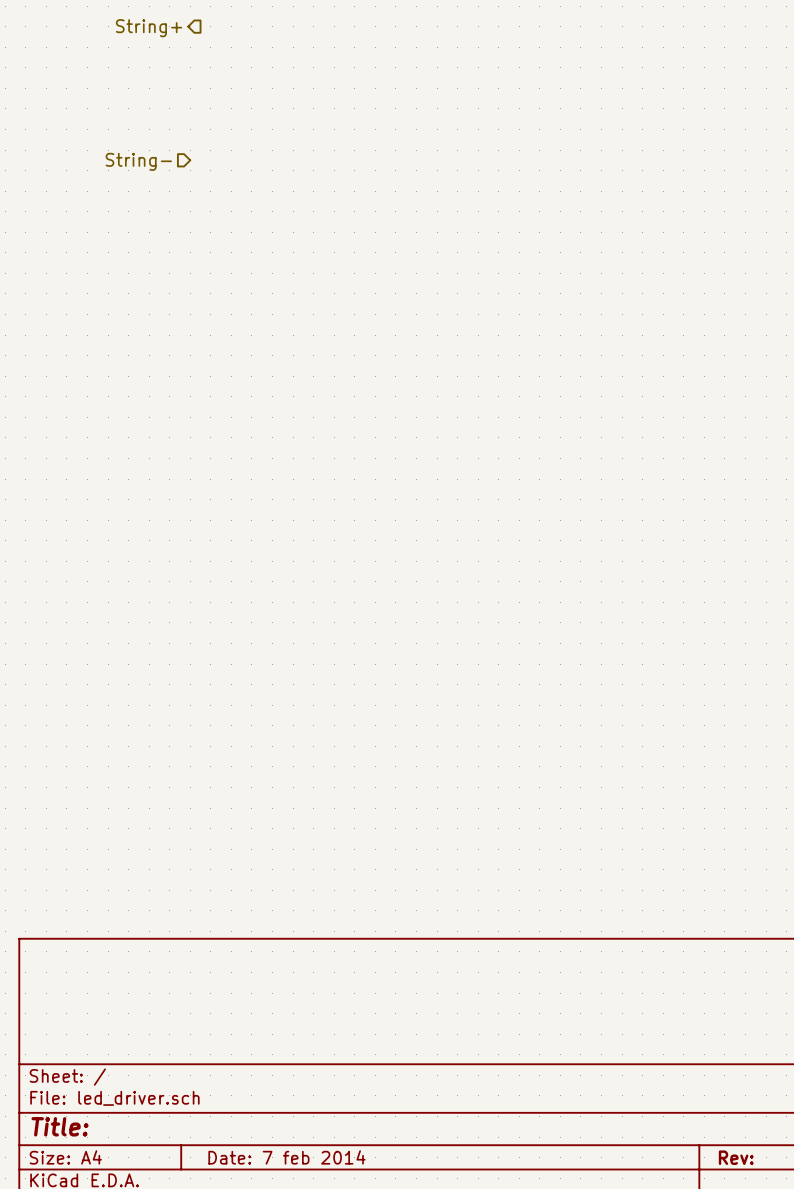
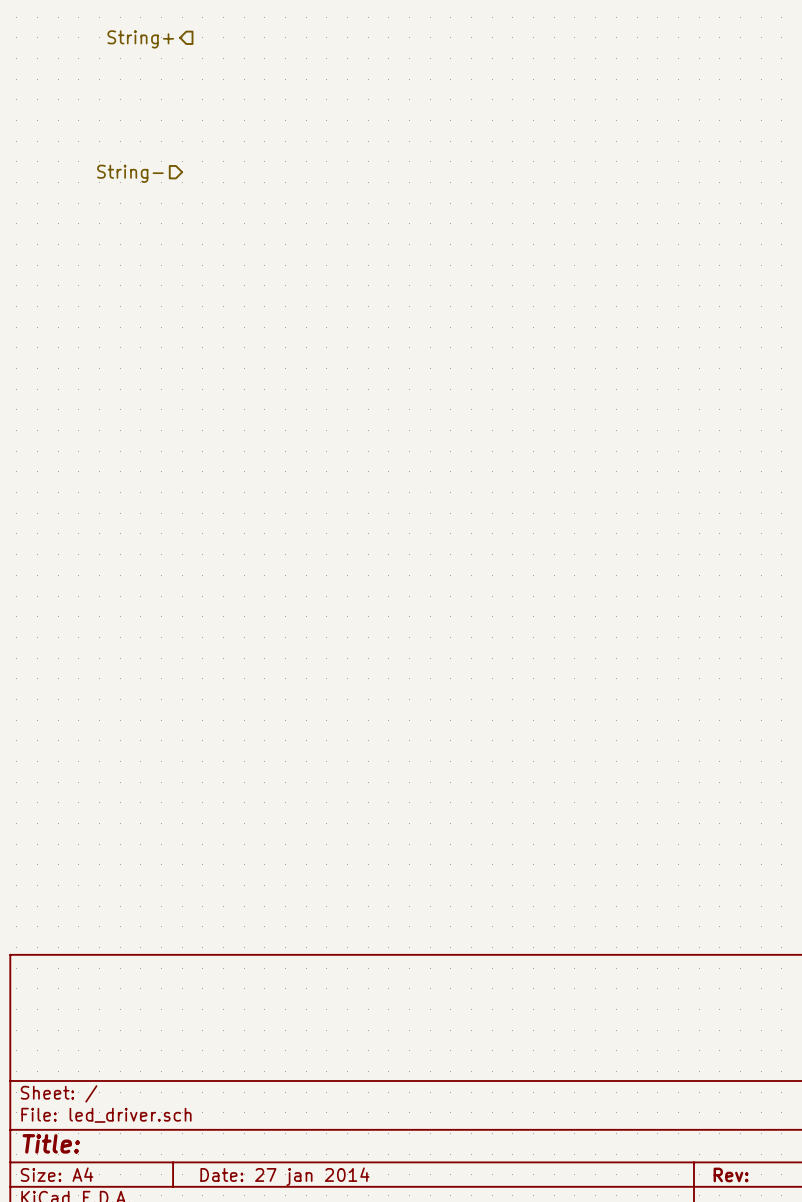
title block: Date: 7 feb 2014 (286, 1157) -> Date: 27 jan 2014 (284, 1176)

